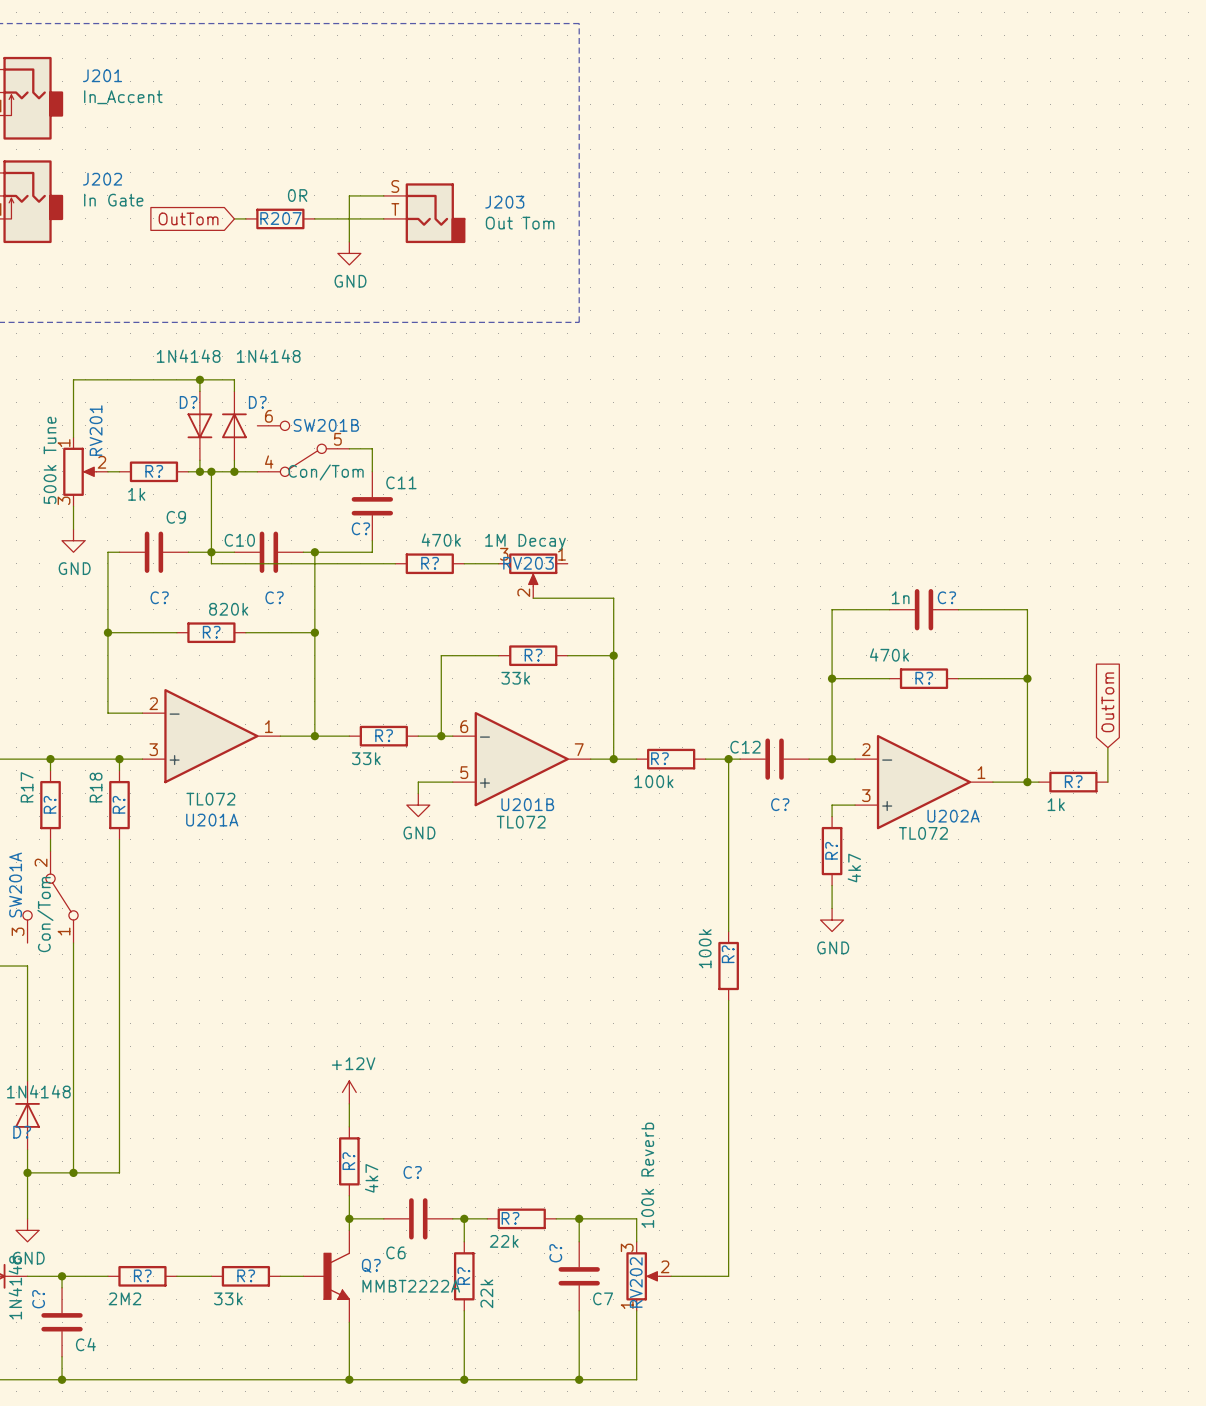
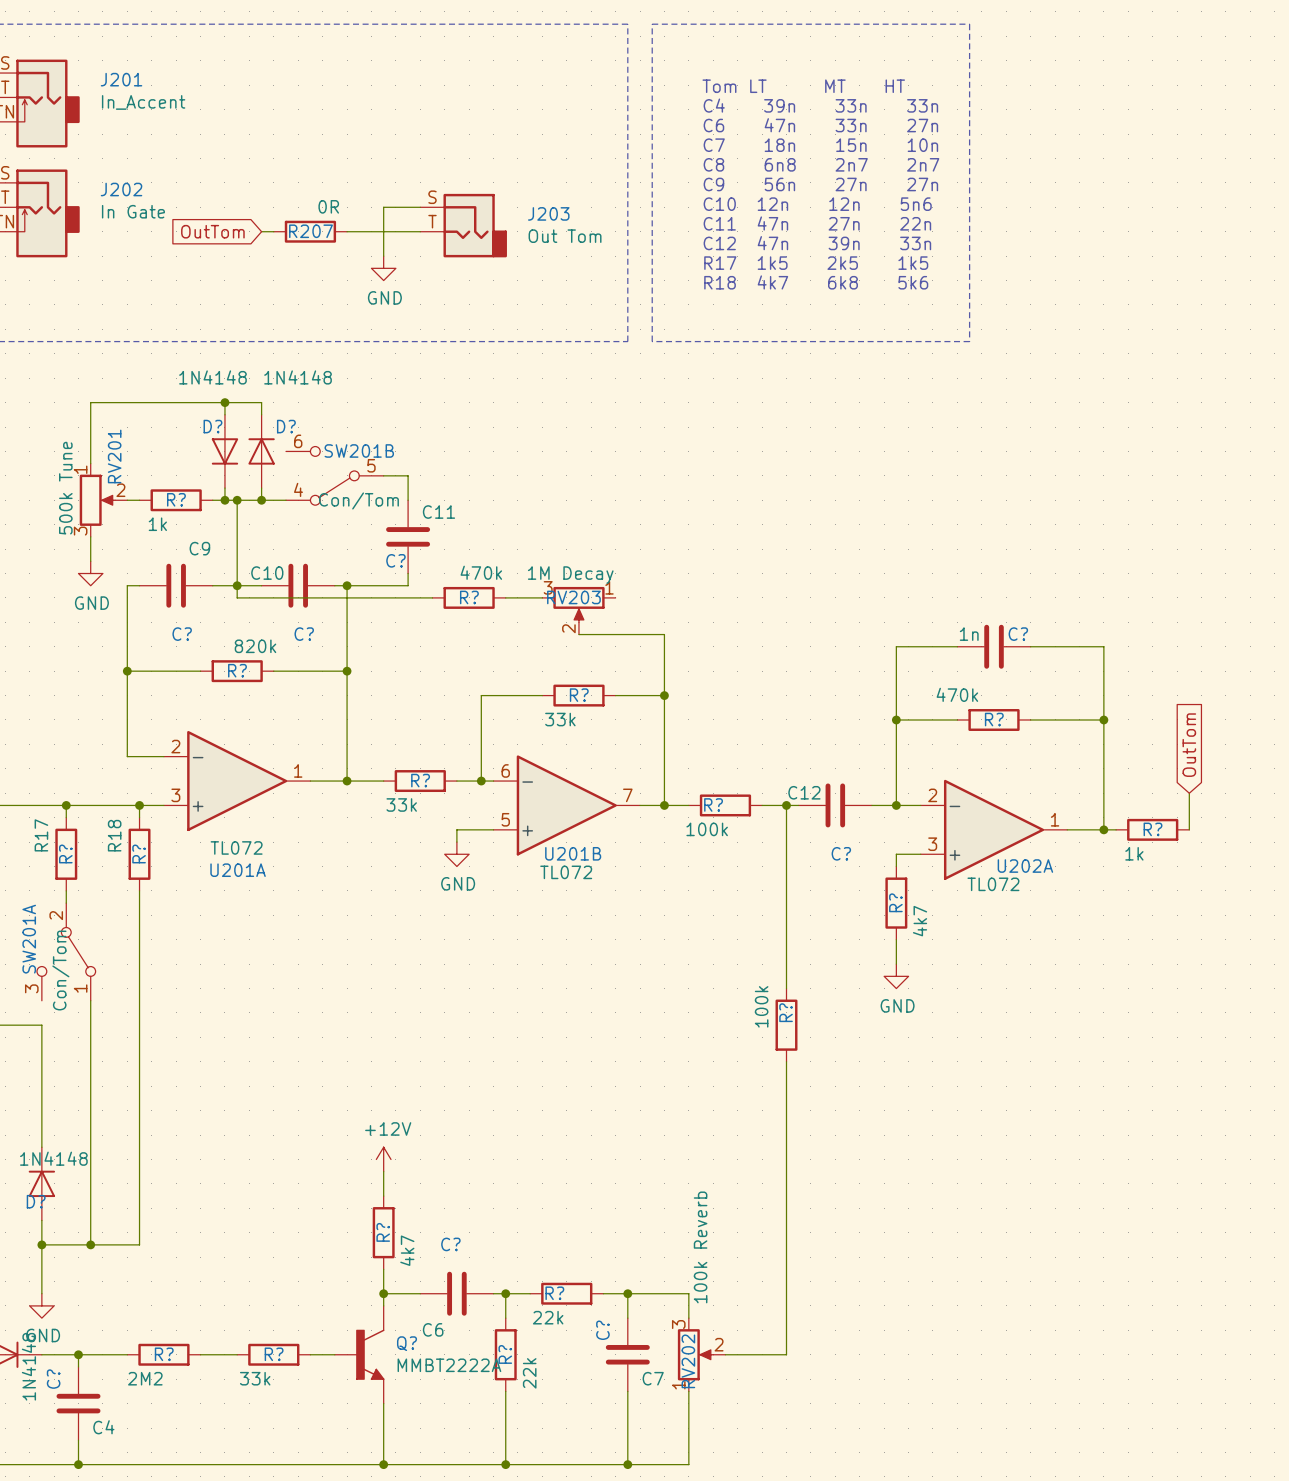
line: none -> (652, 24) (969, 24) (969, 341) (652, 341) (652, 24)
text: none -> Tom LT MT HT (803, 86)
text: none -> C4 39n 33n 33n (820, 105)
text: none -> C6 47n 33n 27n (820, 125)
text: none -> C7 18n 15n 10n (820, 145)
text: none -> C8 6n8 2n7 2n7 (821, 164)
text: none -> C9 56n 27n 27n (820, 184)
text: none -> C10 12n 12n 5n6 (817, 204)
text: none -> C11 47n 27n 22n (817, 223)
text: none -> C12 47n 39n 33n (817, 243)
text: none -> R17 1k5 2k5 1k5 (816, 263)
text: none -> R18 4k7 6k8 5k6 (816, 282)

